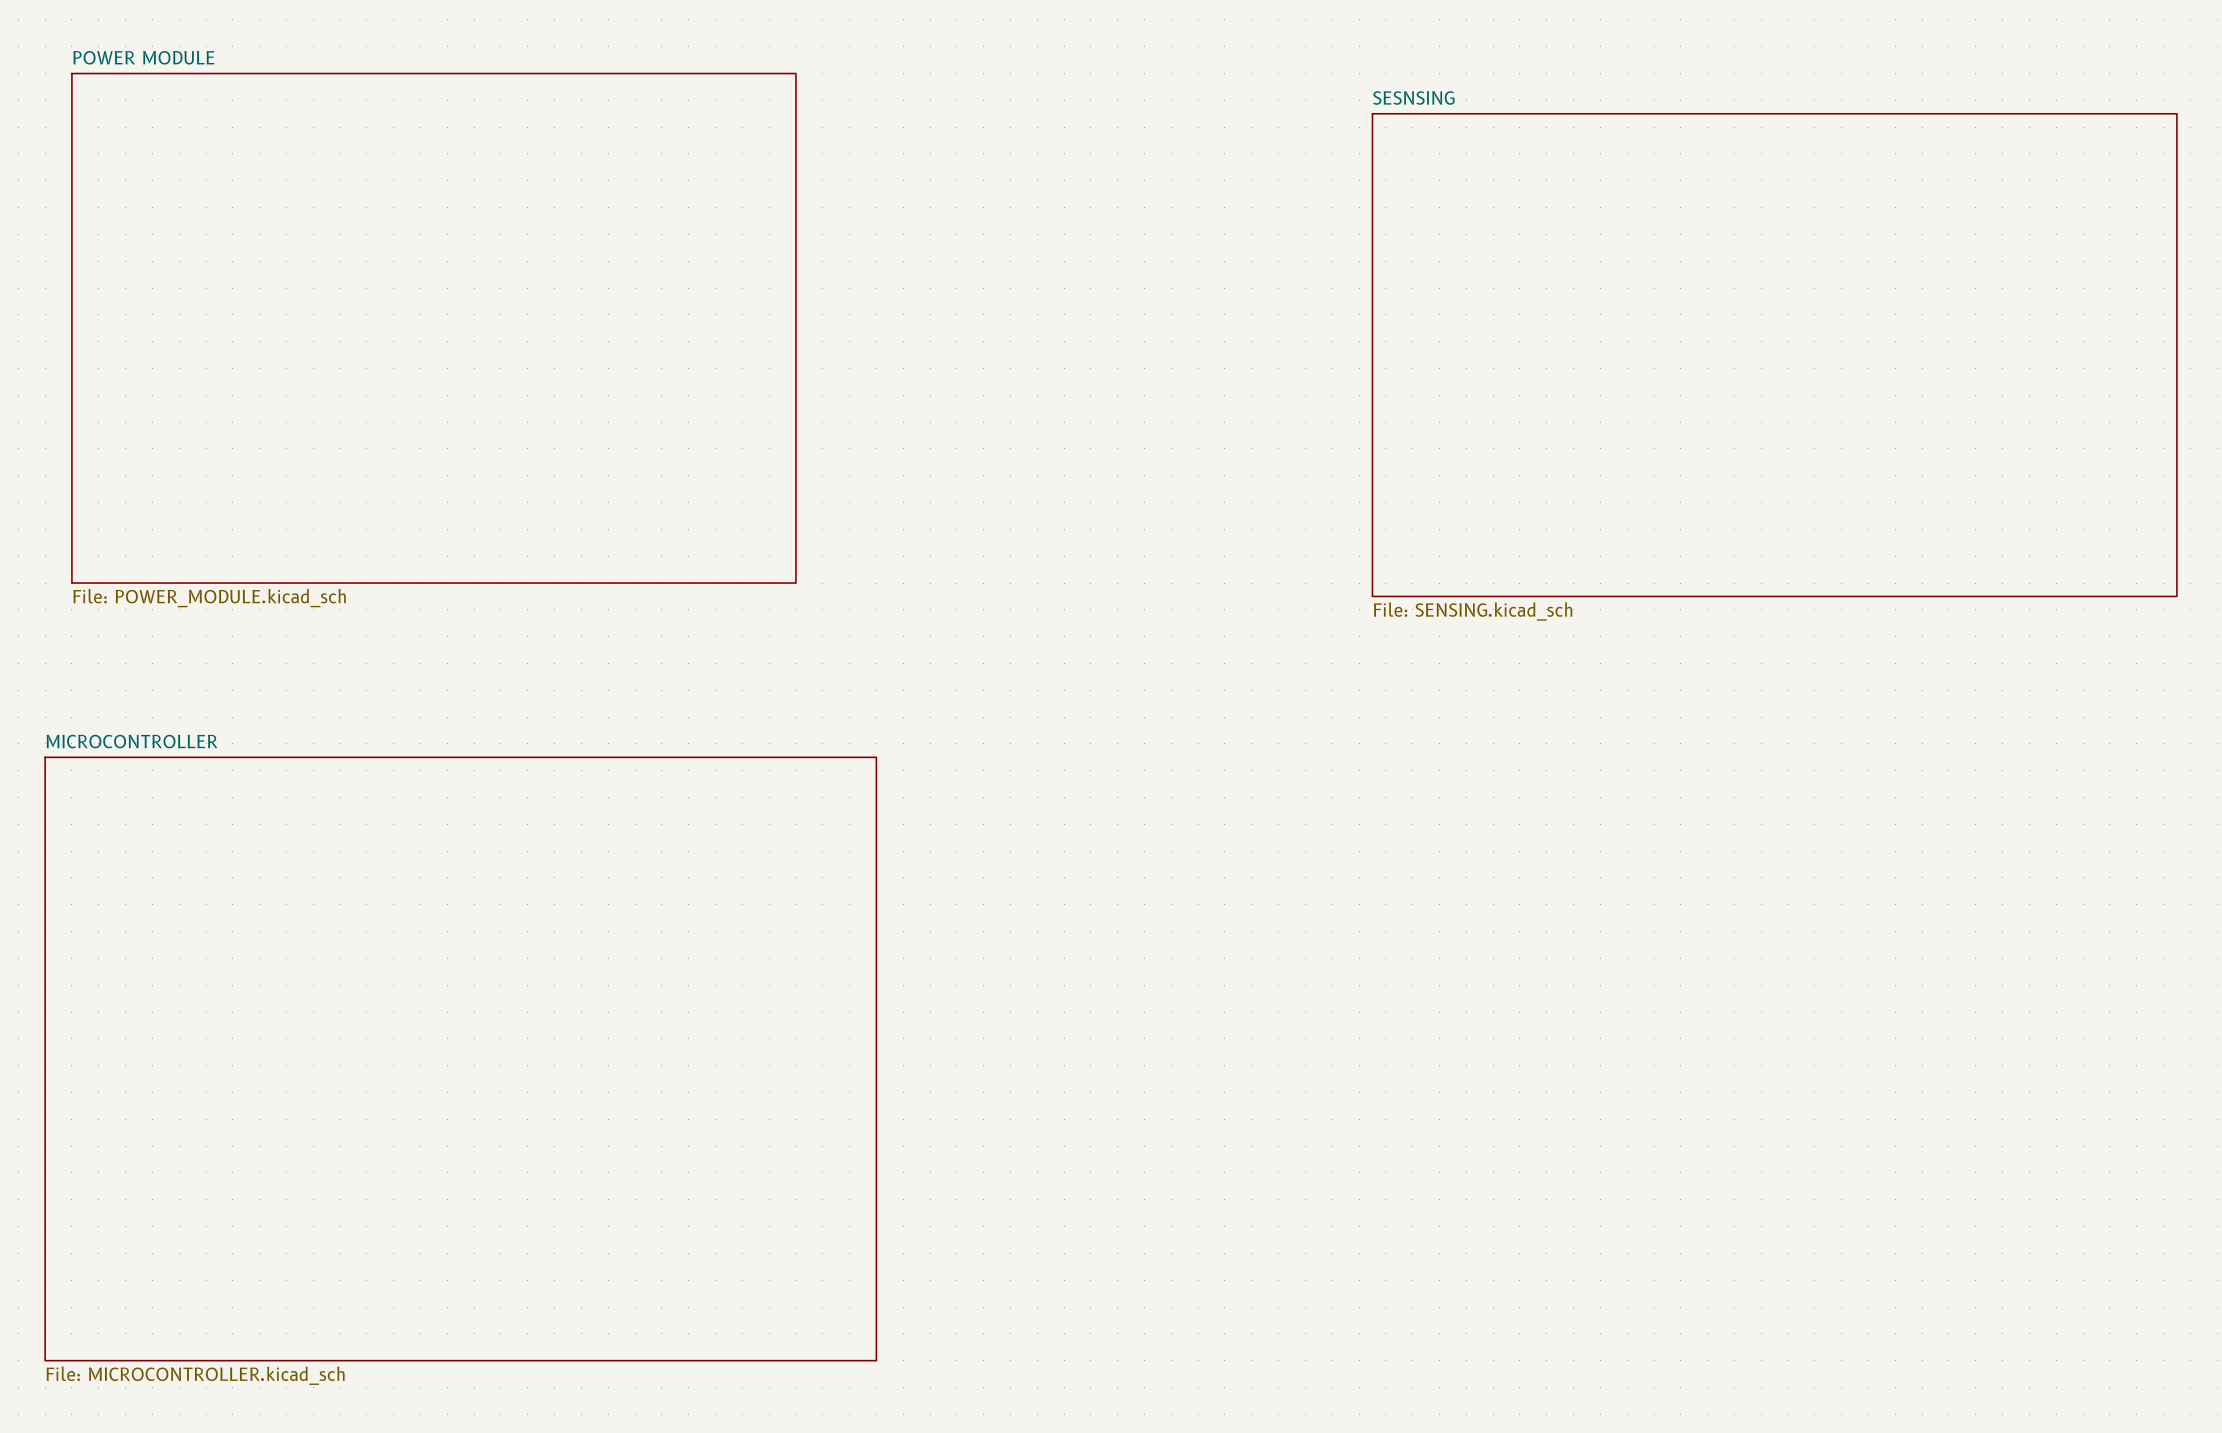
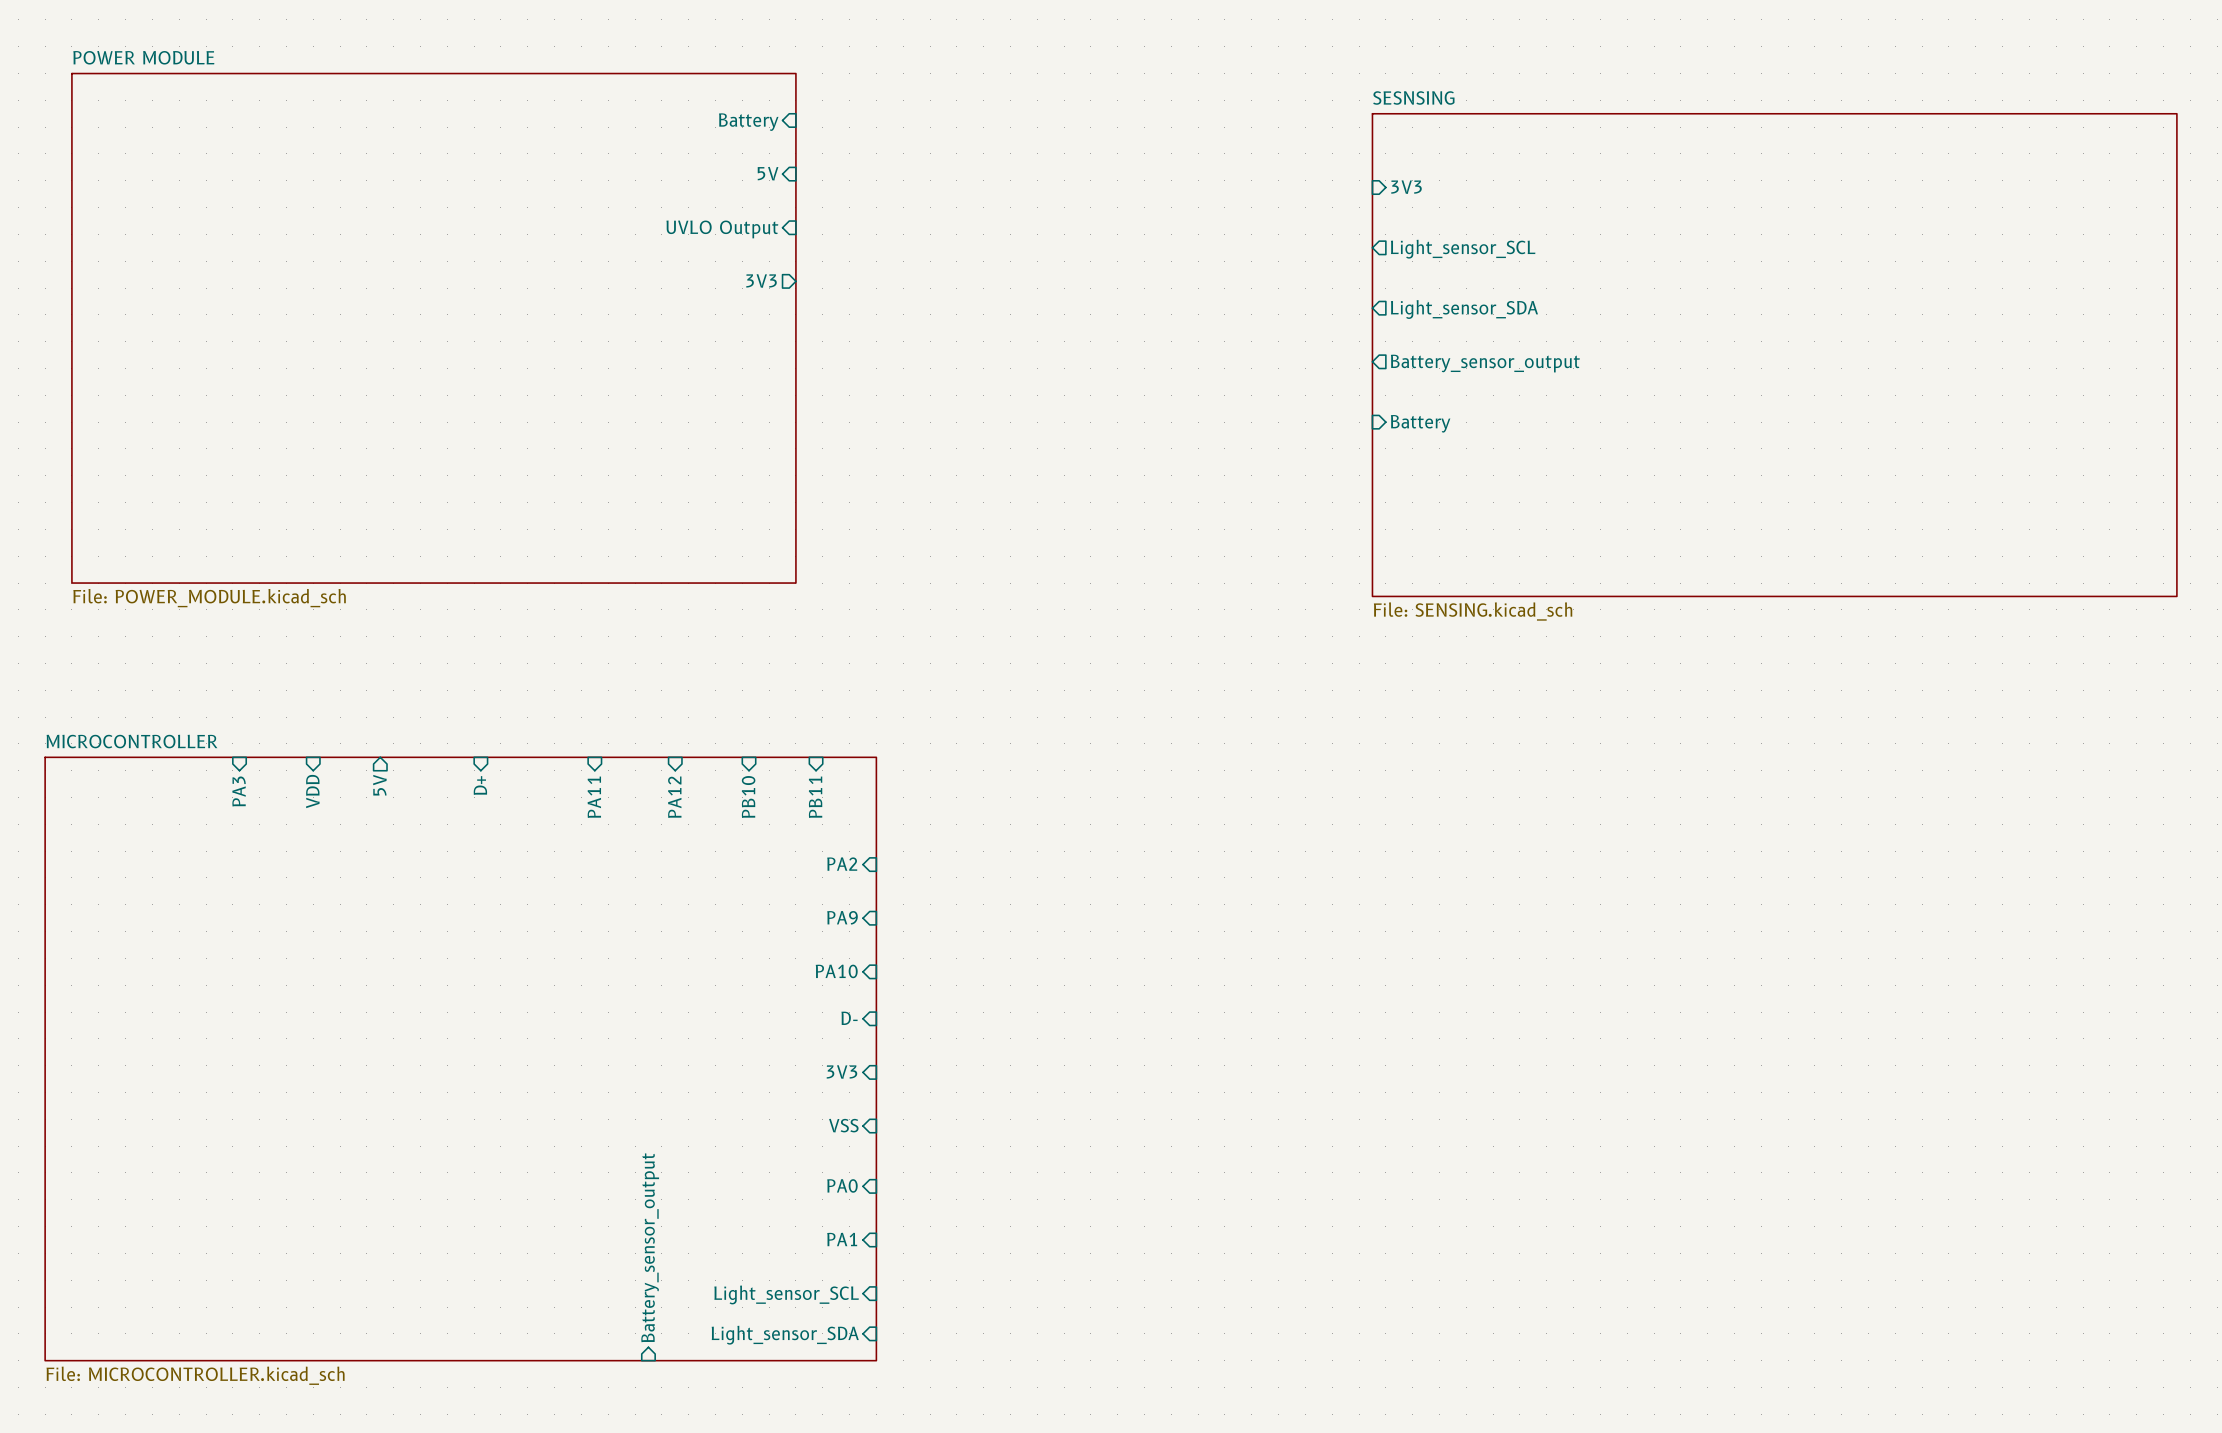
sheet pin: none -> Battery (748, 122)
sheet pin: none -> 5V (768, 173)
sheet pin: none -> 3V3 (1406, 187)
sheet pin: none -> UVLO Output (722, 229)
sheet pin: none -> Light_sensor_SCL (1463, 249)
sheet pin: none -> 3V3 (761, 280)
sheet pin: none -> Light_sensor_SDA (1464, 309)
sheet pin: none -> Battery_sensor_output (1485, 363)
sheet pin: none -> Battery (1420, 423)
sheet pin: none -> 5V (379, 785)
sheet pin: none -> D+ (480, 785)
sheet pin: none -> PA3 (239, 791)
sheet pin: none -> VDD (312, 791)
sheet pin: none -> PA11 (594, 797)
sheet pin: none -> PA12 (674, 797)
sheet pin: none -> PB10 (748, 797)
sheet pin: none -> PB11 (815, 797)
sheet pin: none -> PA2 (842, 864)
sheet pin: none -> PA9 (842, 917)
sheet pin: none -> PA10 (836, 971)
sheet pin: none -> D- (849, 1018)
sheet pin: none -> 3V3 (841, 1071)
sheet pin: none -> VSS (843, 1125)
sheet pin: none -> PA0 (842, 1185)
sheet pin: none -> PA1 (842, 1239)
sheet pin: none -> Battery_sensor_output (650, 1247)
sheet pin: none -> Light_sensor_SCL (786, 1294)
sheet pin: none -> Light_sensor_SDA (785, 1335)

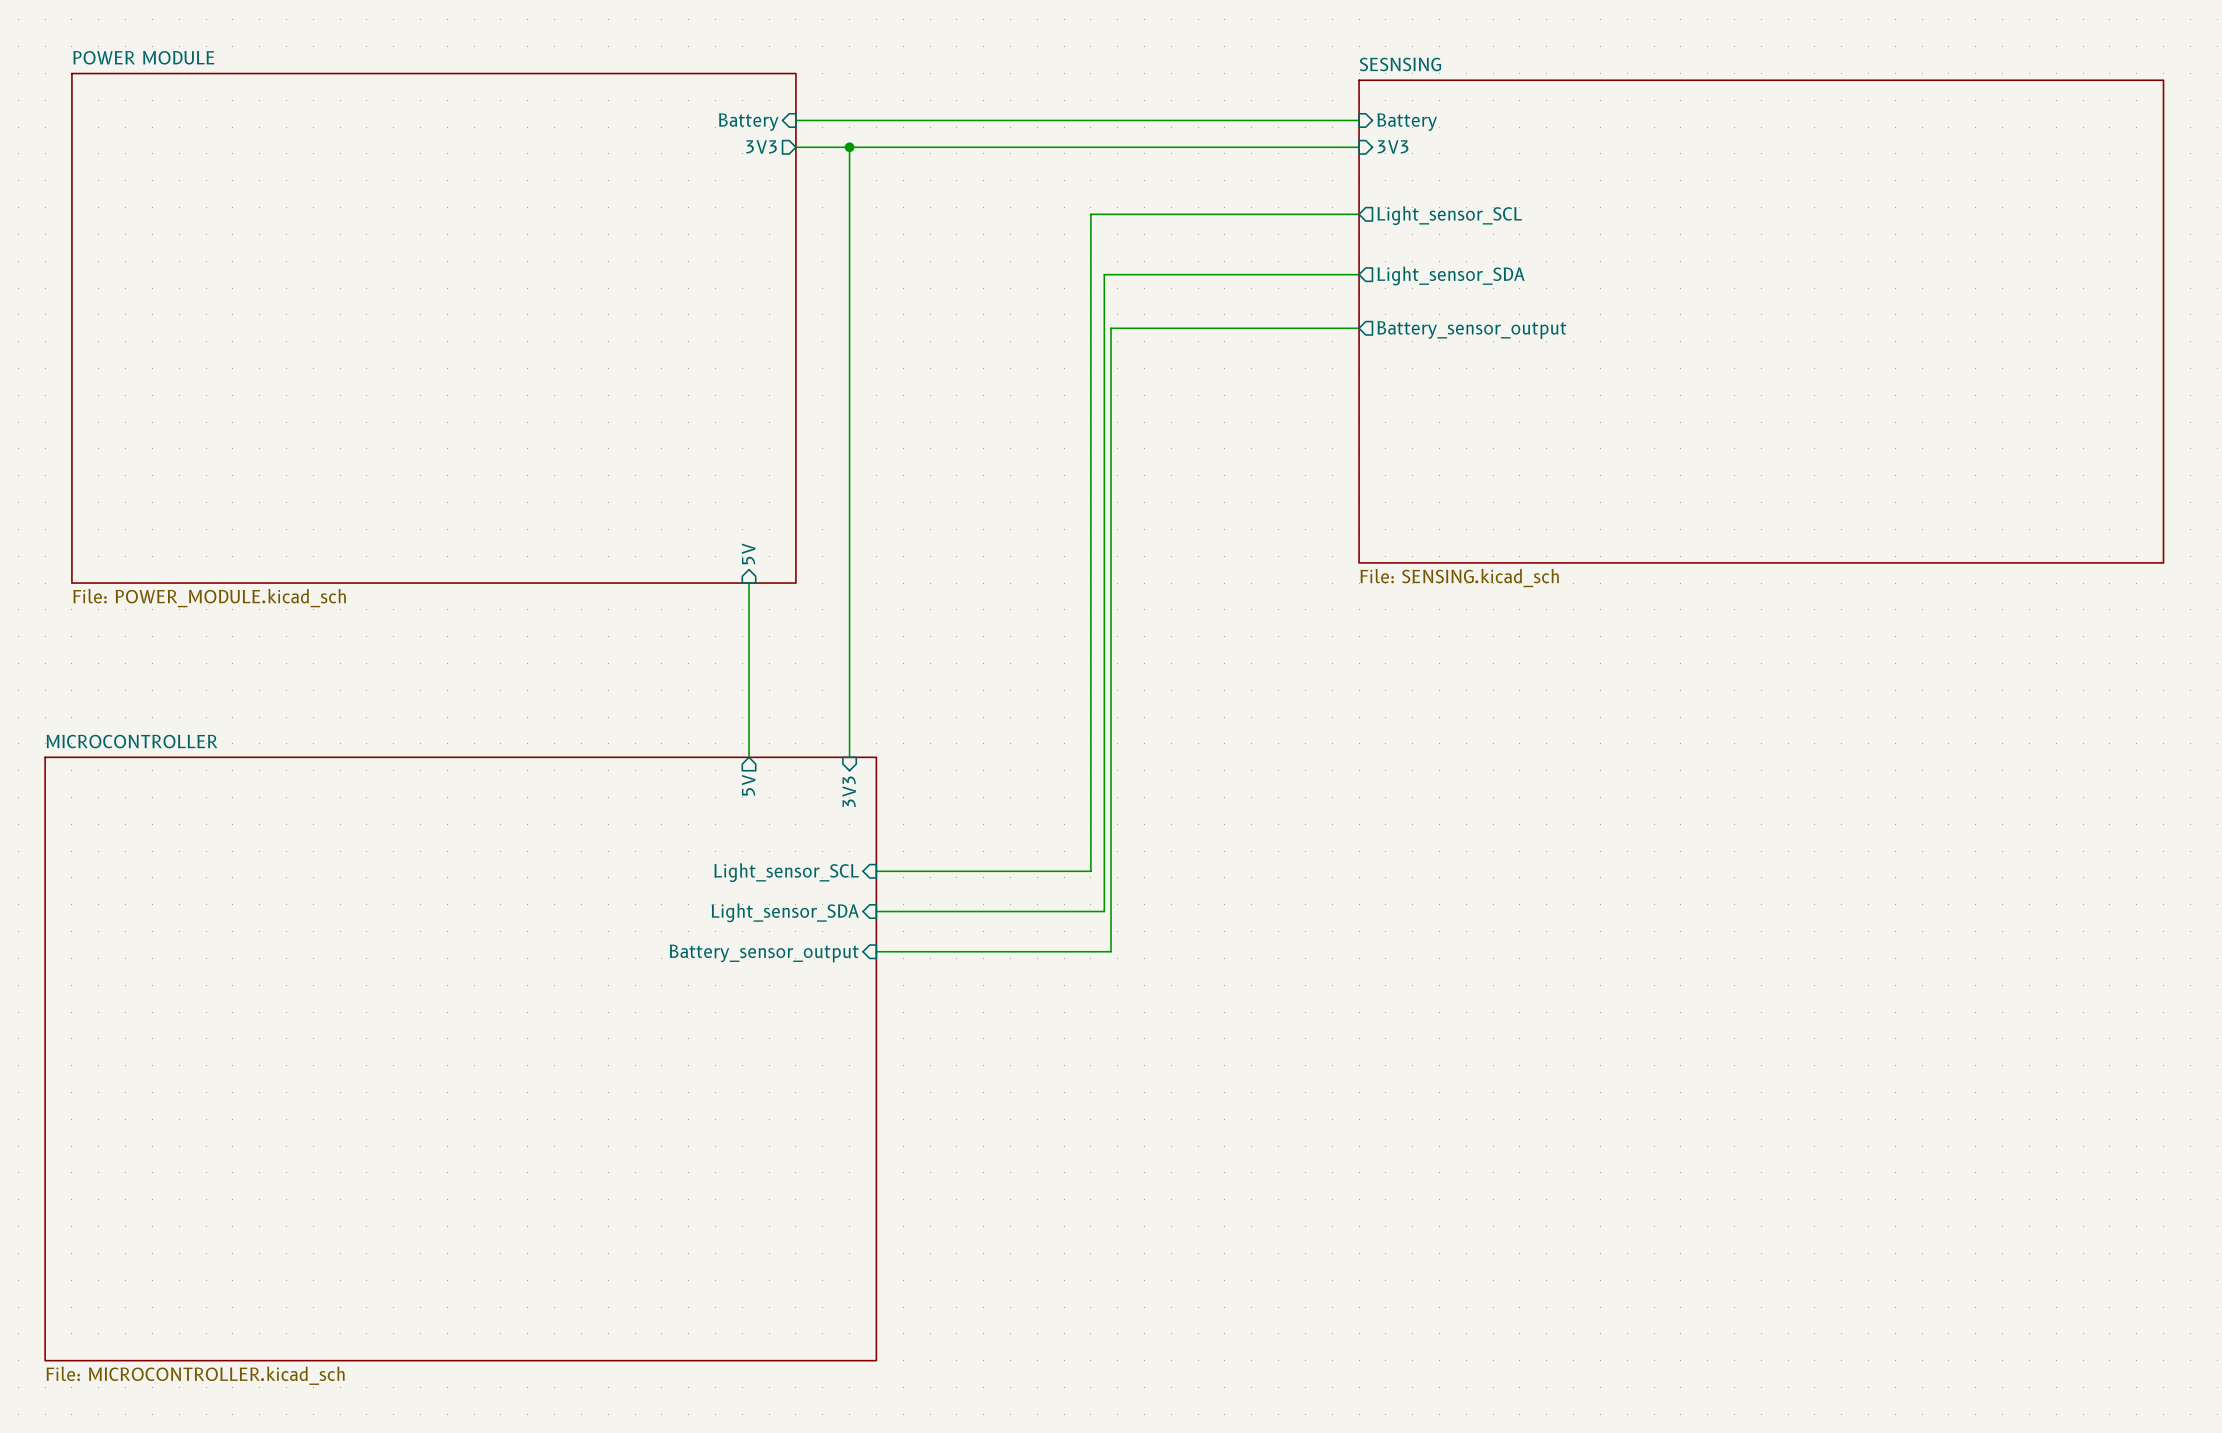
wire: none -> (795, 120) (1359, 120)
sheet pin: none -> Battery (1407, 122)
wire: none -> (795, 147) (1359, 147)
wire: none -> (849, 147) (849, 757)
junction: none -> (849, 147)
sheet pin: 5V (768, 173) -> none
sheet pin position: 3V3 (1406, 187) -> 3V3 (1393, 146)
wire: none -> (1359, 214) (1090, 214) (1090, 871) (876, 871)
sheet pin: UVLO Output (722, 229) -> none
sheet pin position: Light_sensor_SCL (1463, 249) -> Light_sensor_SCL (1449, 215)
wire: none -> (1359, 274) (1104, 274) (1104, 911) (876, 911)
sheet pin position: 3V3 (761, 280) -> 3V3 (761, 146)
sheet pin position: Light_sensor_SDA (1464, 309) -> Light_sensor_SDA (1451, 275)
wire: none -> (1359, 328) (1111, 328) (1111, 951) (876, 951)
sheet SESNSING position: (1774, 355) -> (1761, 321)
sheet pin position: Battery_sensor_output (1485, 363) -> Battery_sensor_output (1471, 330)
sheet pin: Battery (1420, 423) -> none
sheet pin: none -> 5V (748, 553)
wire: none -> (749, 583) (749, 757)
sheet pin: 5V (379, 785) -> none
sheet pin: D+ (480, 785) -> none
sheet pin: PA3 (239, 791) -> none
sheet pin: VDD (312, 791) -> none
sheet pin: none -> 3V3 (849, 791)
sheet pin: PA11 (594, 797) -> none
sheet pin: PA12 (674, 797) -> none
sheet pin shape: input (748, 797) -> output (748, 785)
sheet pin: PB10 (748, 797) -> 5V (748, 785)
sheet pin: PB11 (815, 797) -> none
sheet pin: PA2 (842, 864) -> Light_sensor_SCL (786, 872)
sheet pin: PA9 (842, 917) -> Light_sensor_SDA (785, 912)
sheet pin: none -> Battery_sensor_output (764, 953)
sheet pin: PA10 (836, 971) -> none
sheet pin: D- (849, 1018) -> none
sheet pin: 3V3 (841, 1071) -> none
sheet pin: VSS (843, 1125) -> none
sheet pin: PA0 (842, 1185) -> none
sheet pin: PA1 (842, 1239) -> none
sheet pin: Battery_sensor_output (650, 1247) -> none
sheet pin: Light_sensor_SCL (786, 1294) -> none
sheet pin: Light_sensor_SDA (785, 1335) -> none

